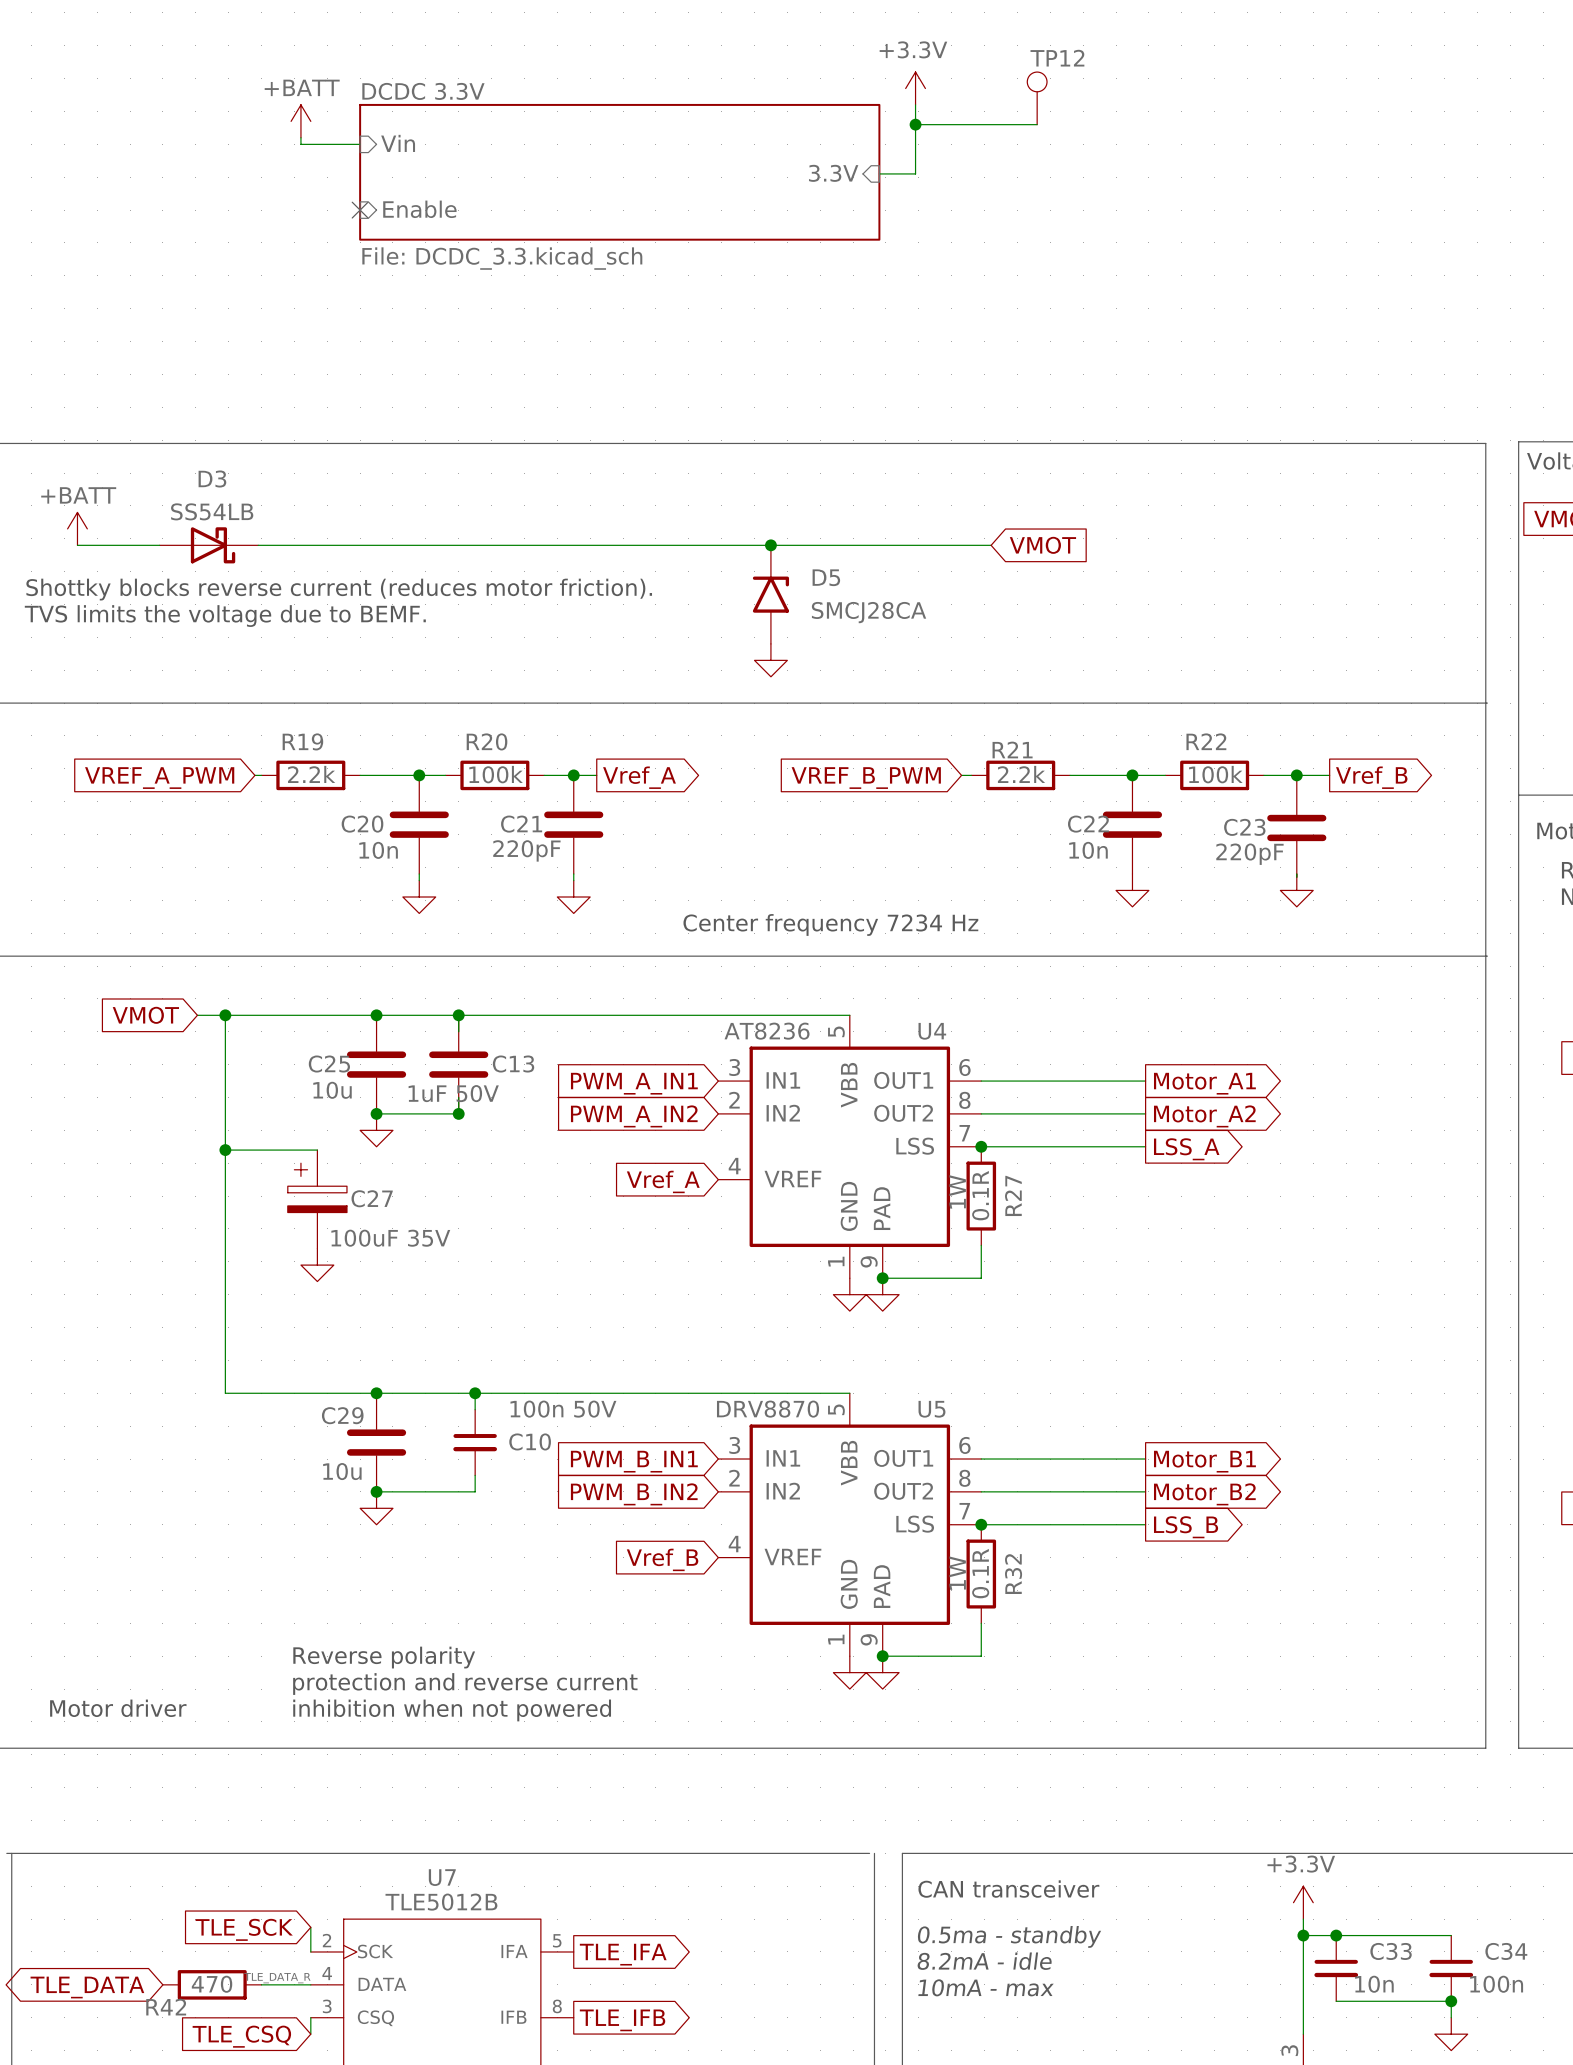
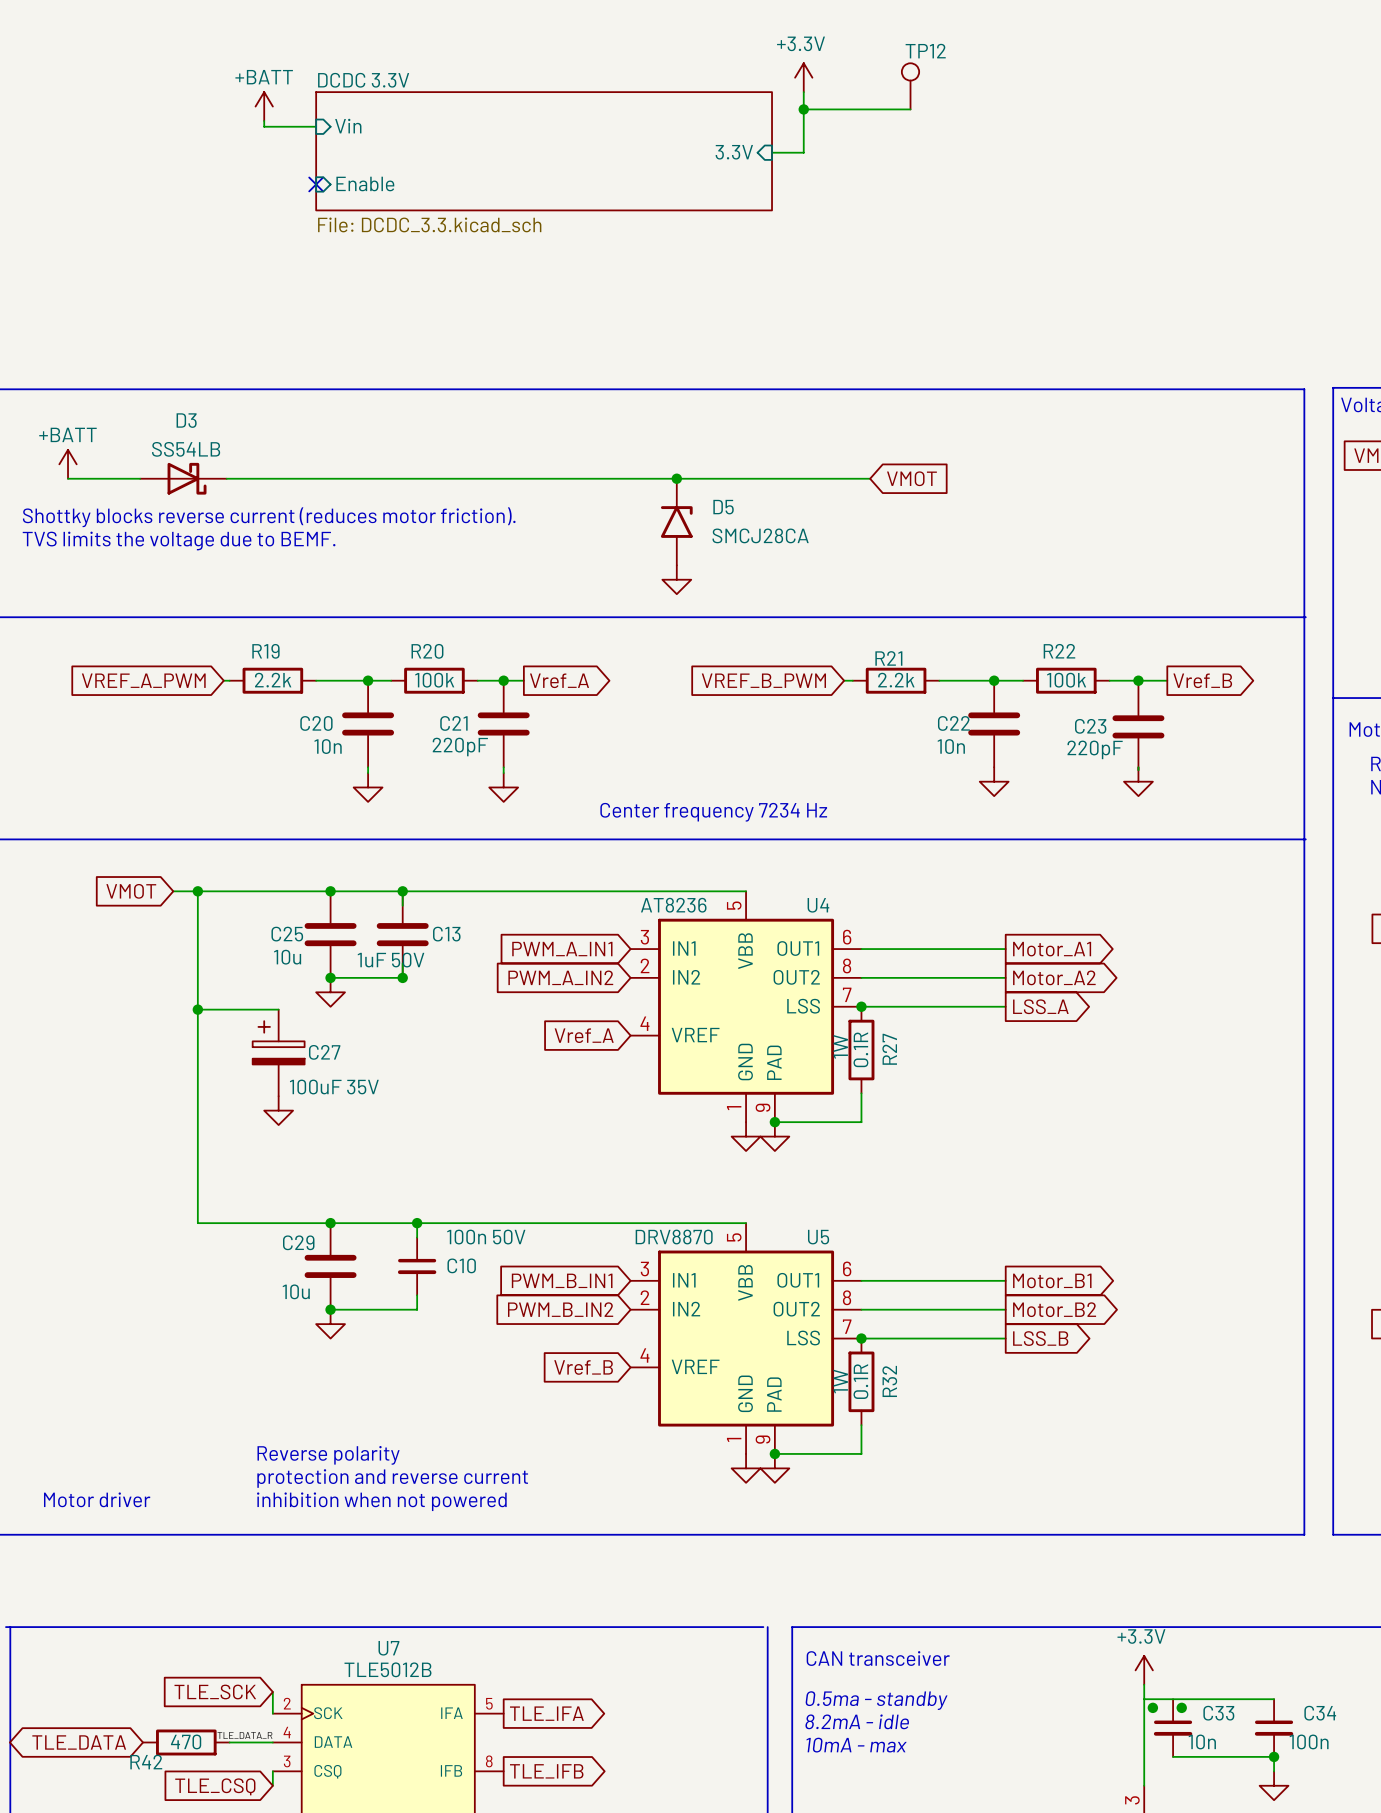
junction: (1303, 1935) -> none
junction: (1336, 1935) -> none
junction: none -> (1152, 1707)
junction: none -> (1181, 1707)

